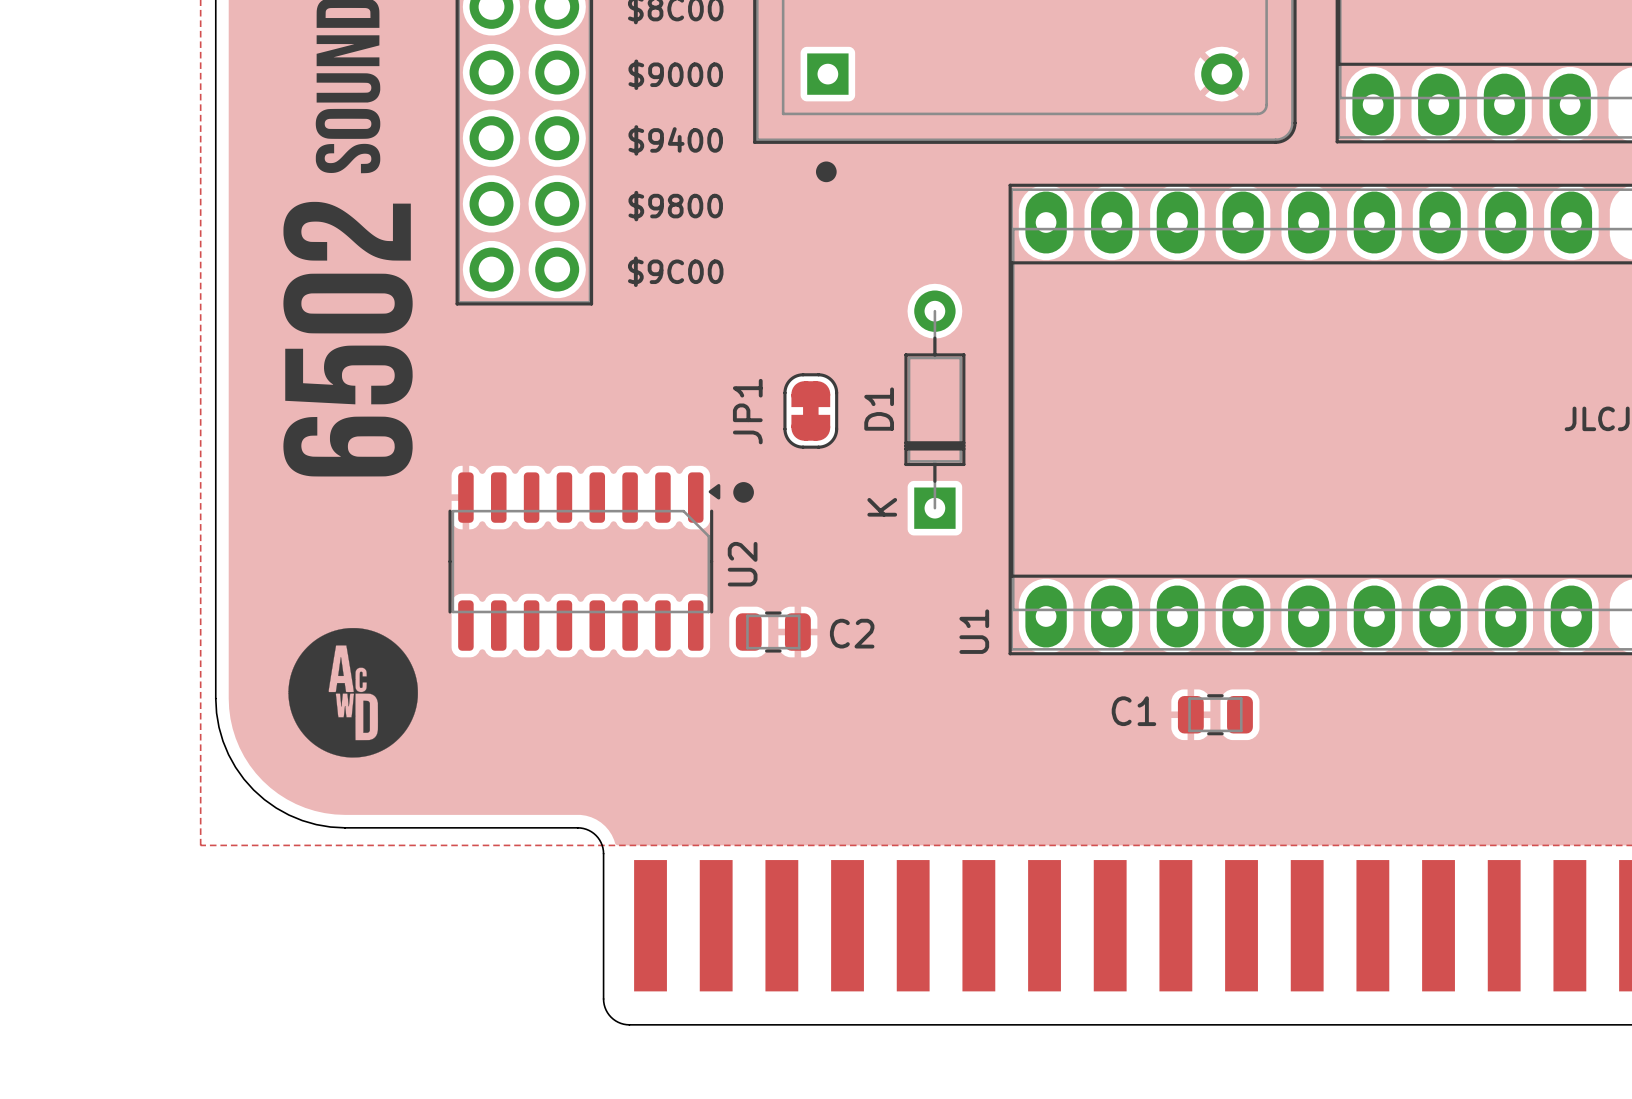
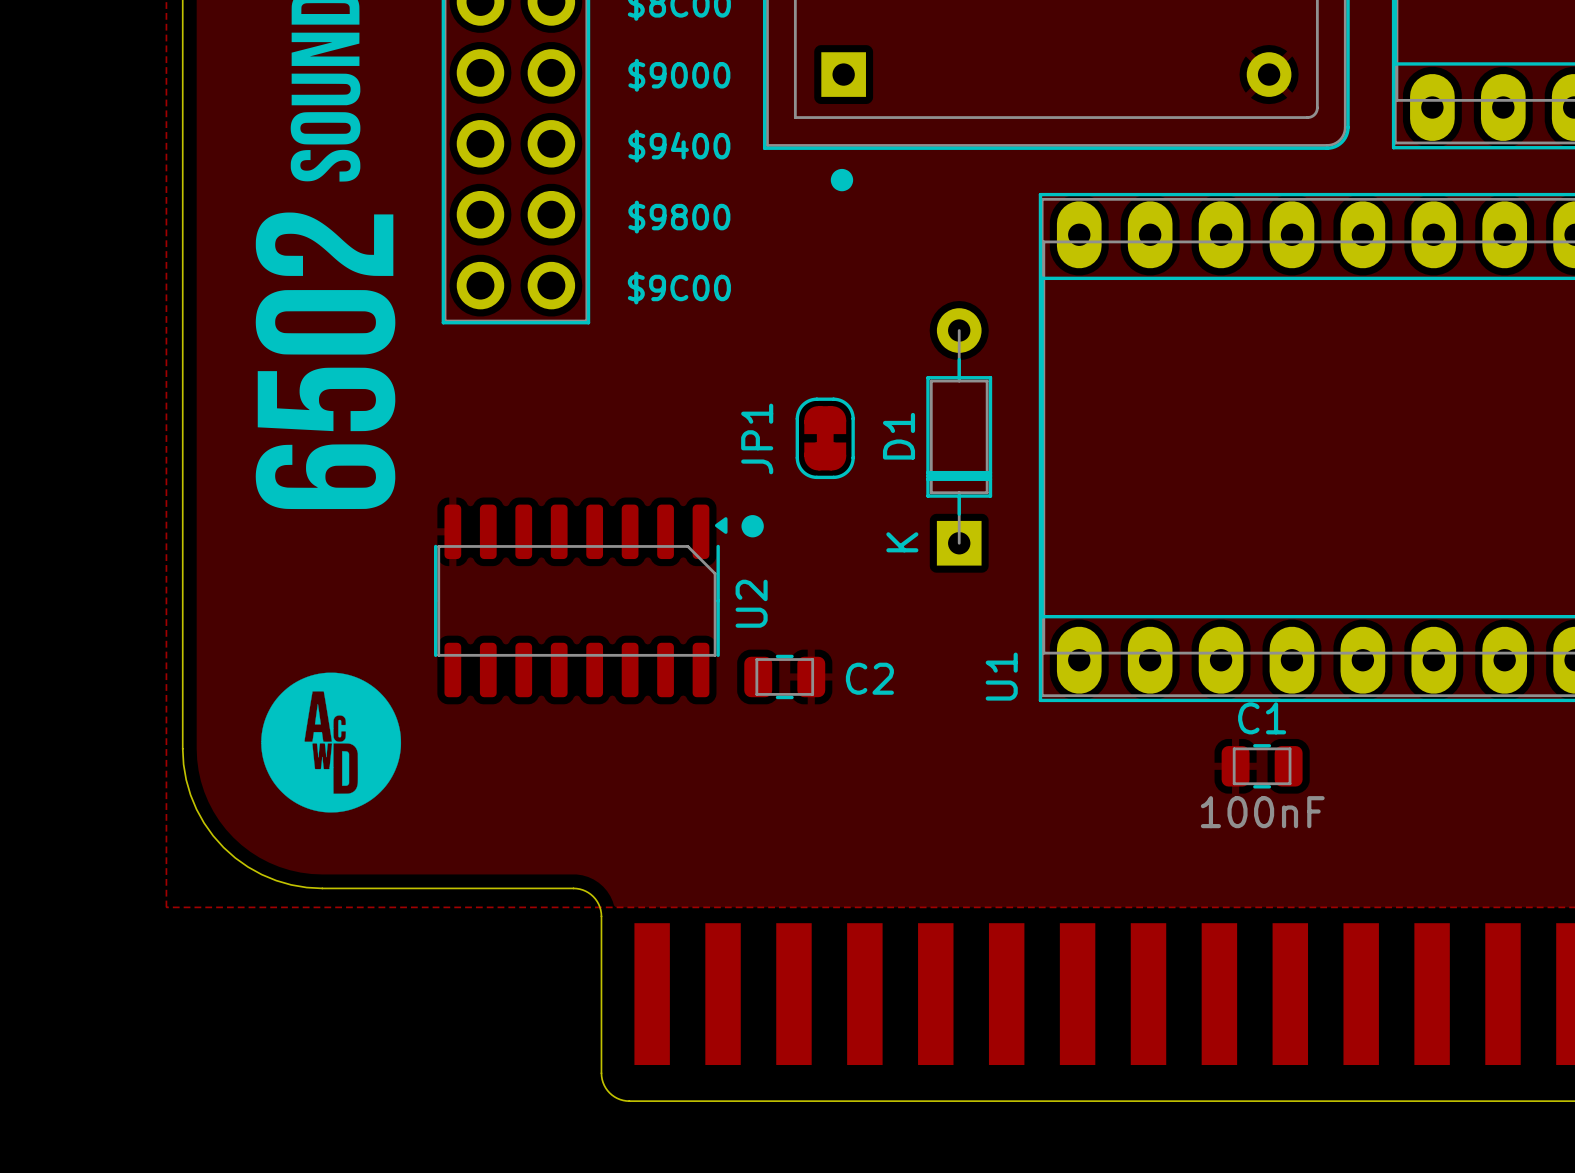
C1 name position: C1 (1133, 711) -> C1 (1262, 718)
C1 value: none -> 100nF (1262, 812)

